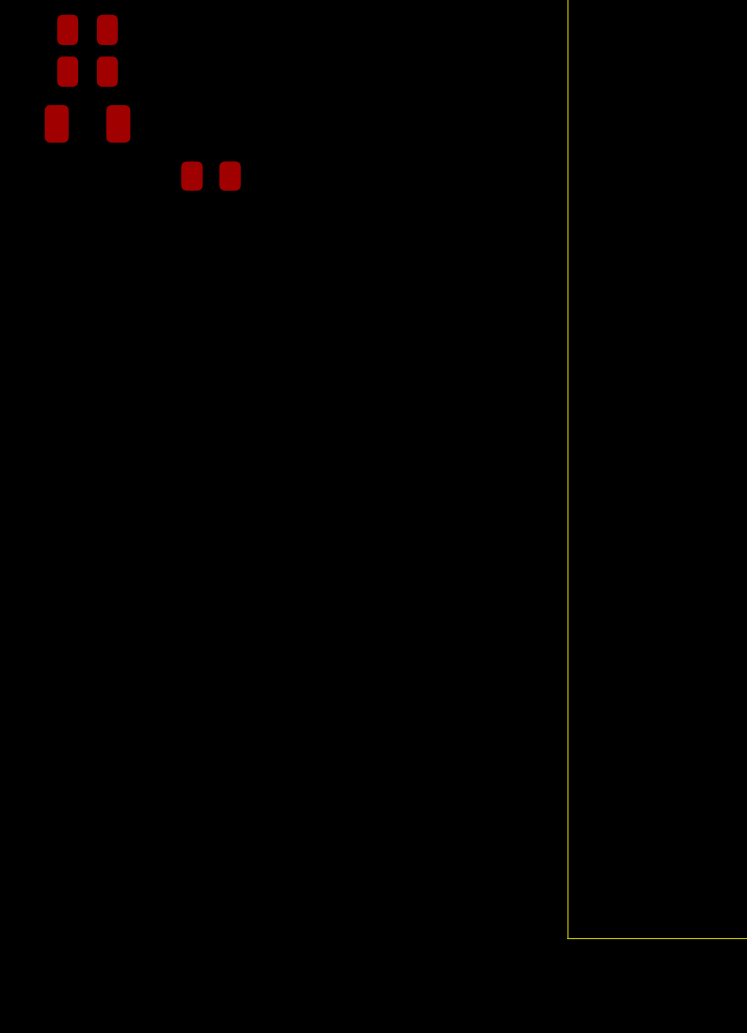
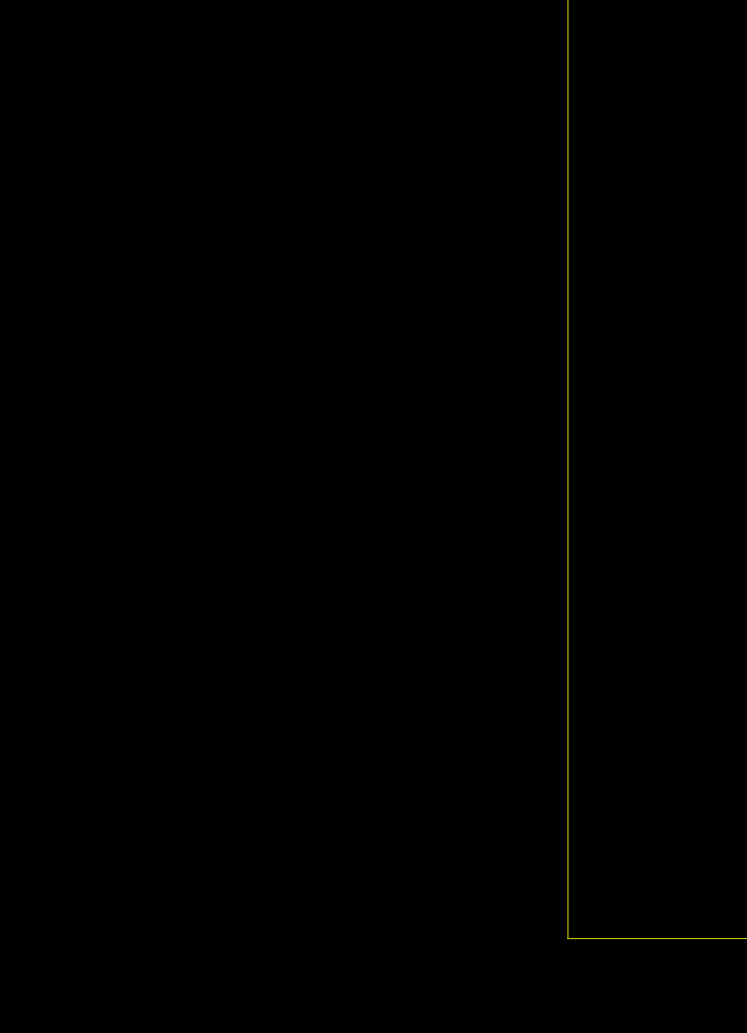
part: (87, 29) -> none
part: (87, 71) -> none
part: (87, 123) -> none
part: (211, 176) -> none

